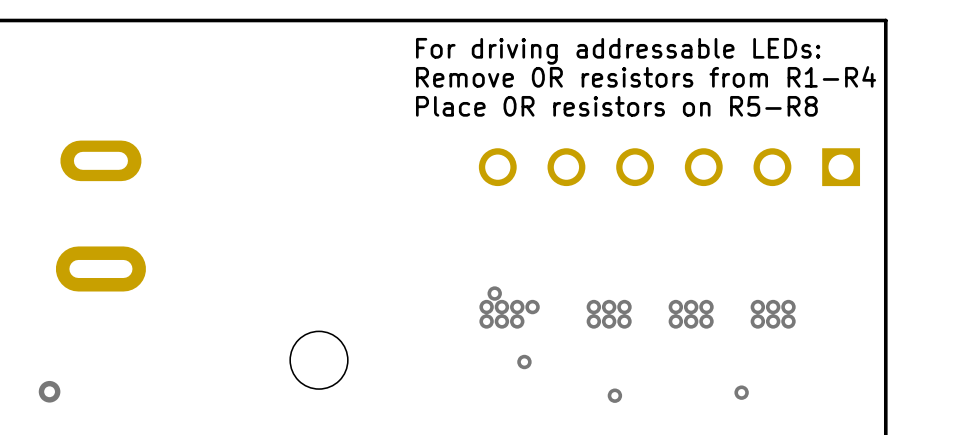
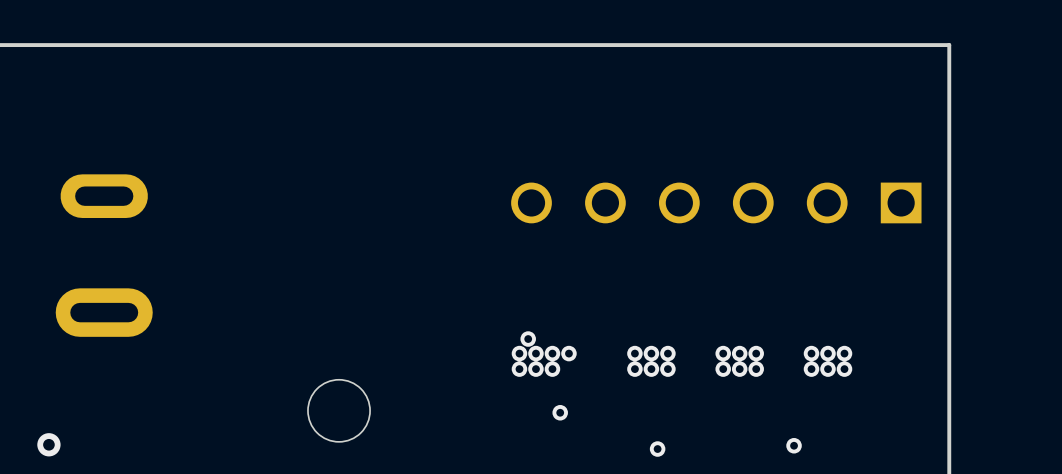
text: For driving addressable LEDs: (618, 51) -> none
text: Remove 0R resistors from R1-R4 (646, 76) -> none
text: Place 0R resistors on R5-R8 (616, 106) -> none

